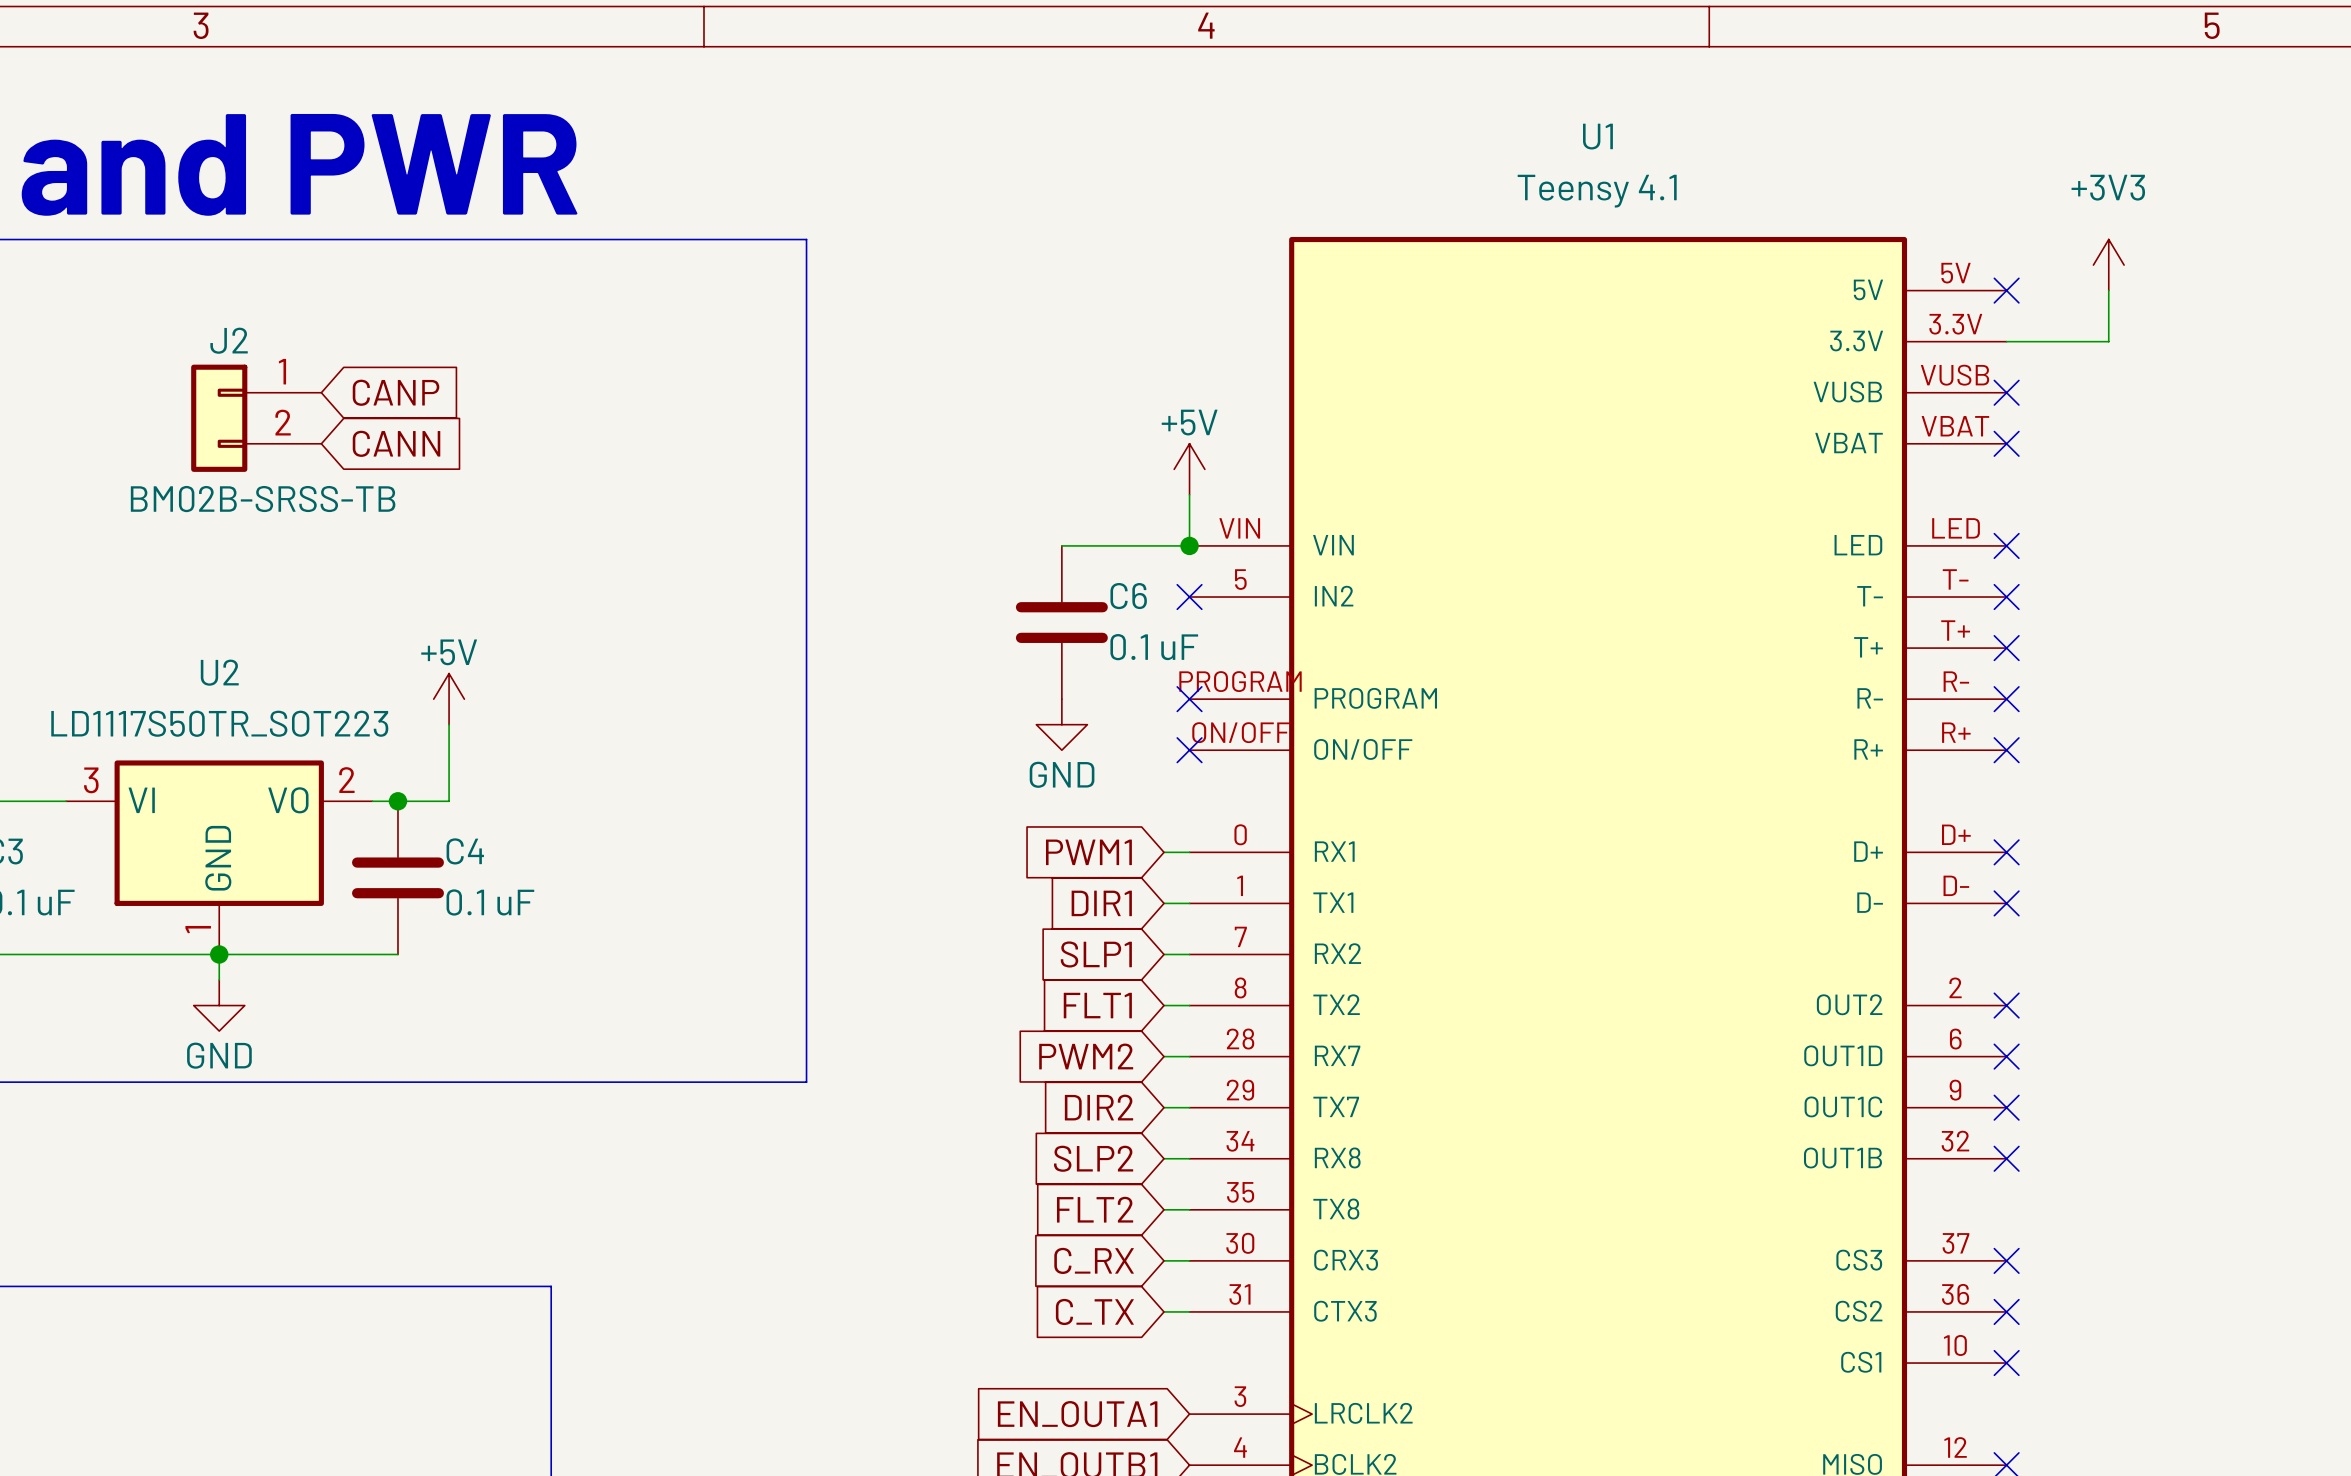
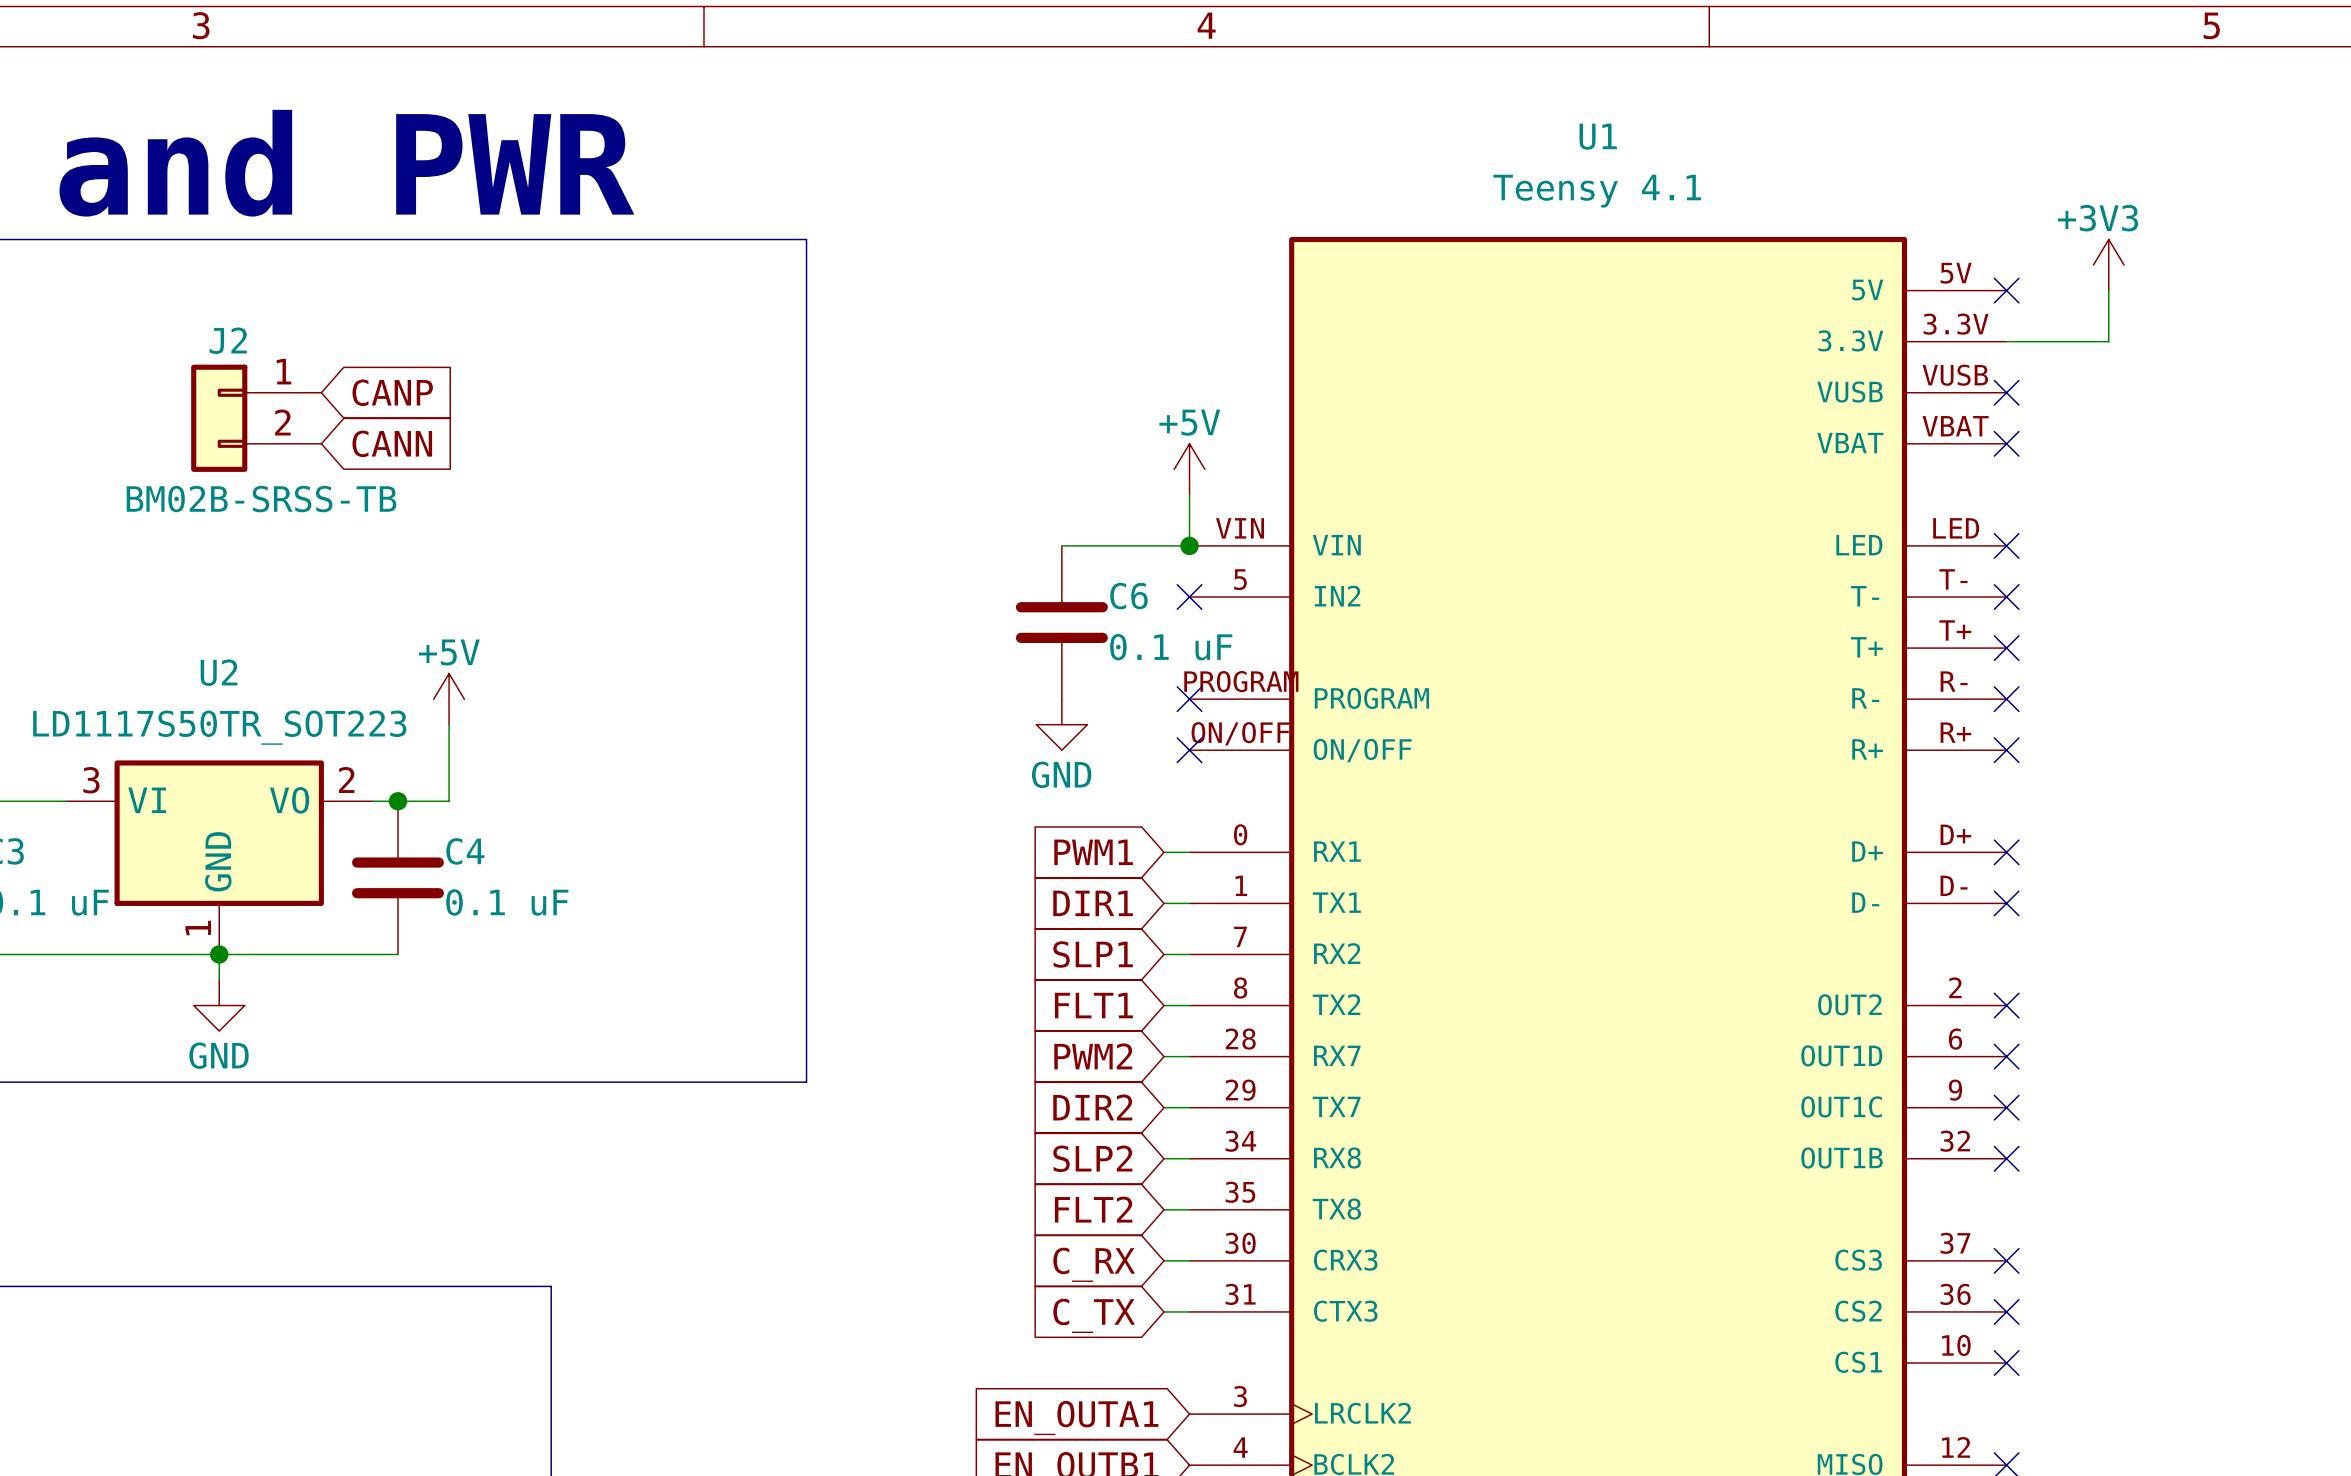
power symbol text position: +3V3 (2108, 187) -> +3V3 (2097, 218)

